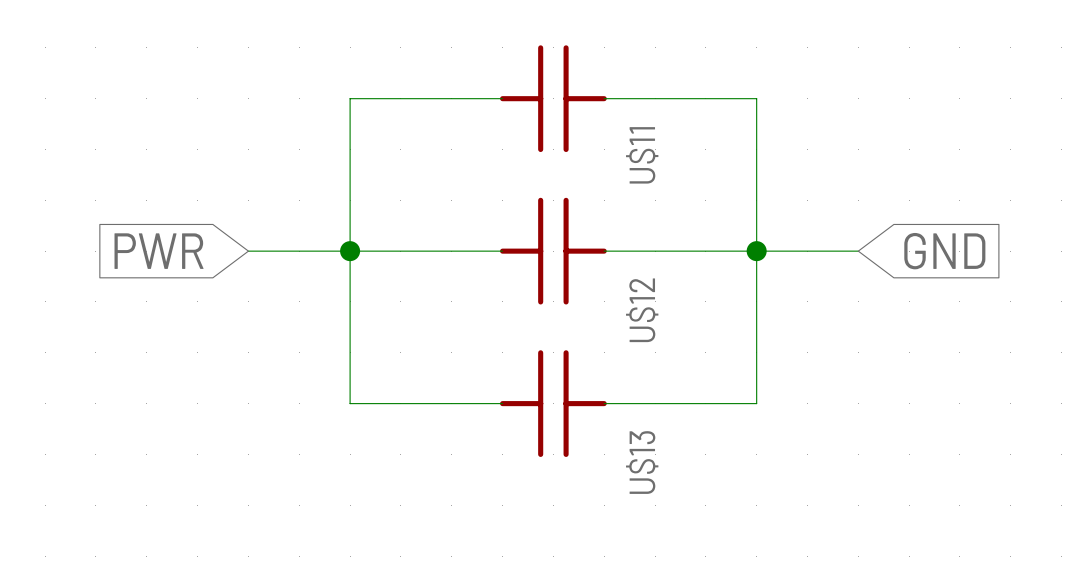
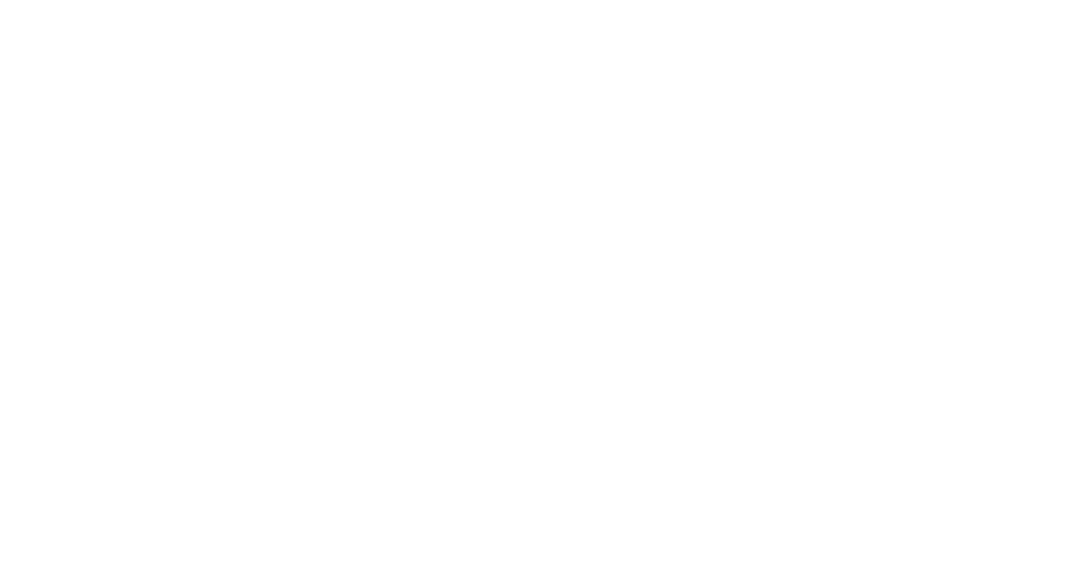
wire: (502, 98) (350, 98) (350, 403) (502, 403) -> none
U$11: (553, 98) -> none
wire: (604, 98) (756, 98) (756, 403) (604, 403) -> none
global label: PWR (159, 251) -> none
wire: (248, 251) (502, 251) -> none
junction: (350, 251) -> none
U$12: (553, 251) -> none
wire: (604, 251) (858, 251) -> none
junction: (756, 251) -> none
global label: GND (944, 251) -> none
U$13: (553, 403) -> none

